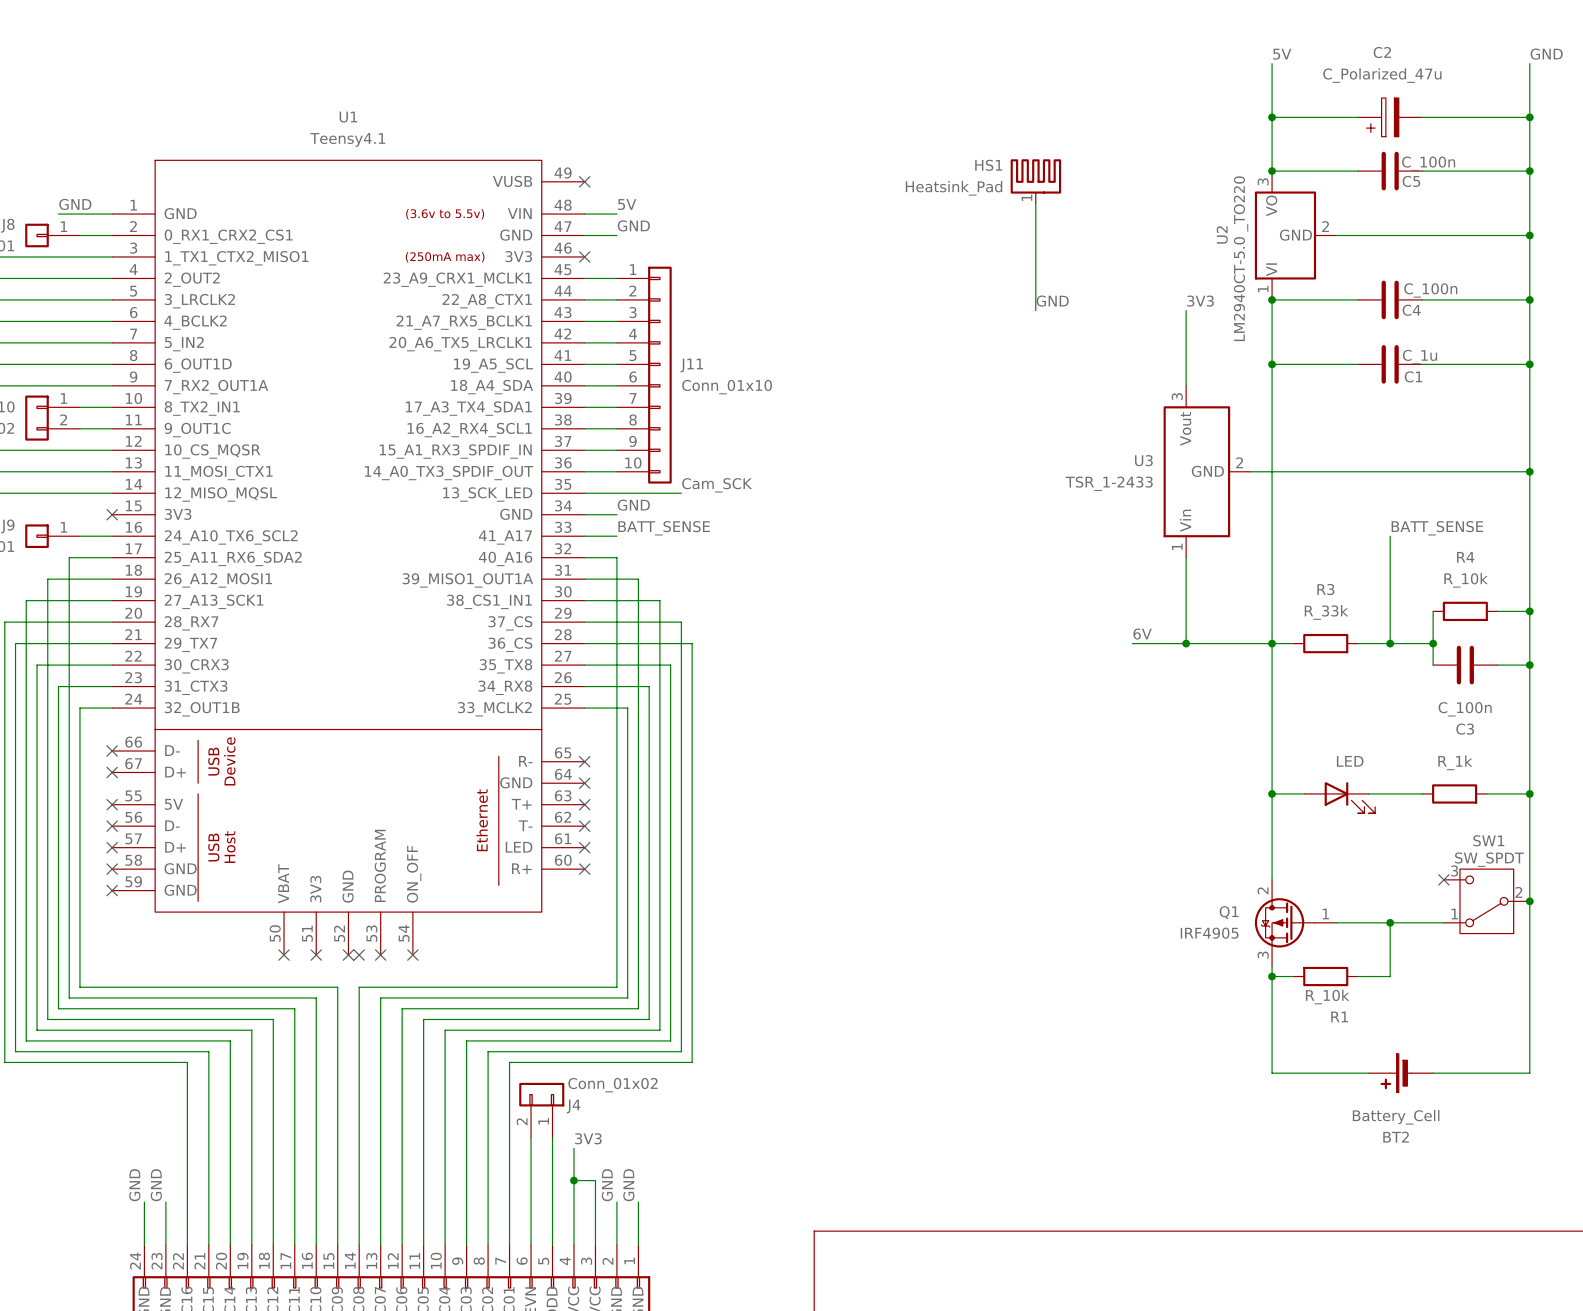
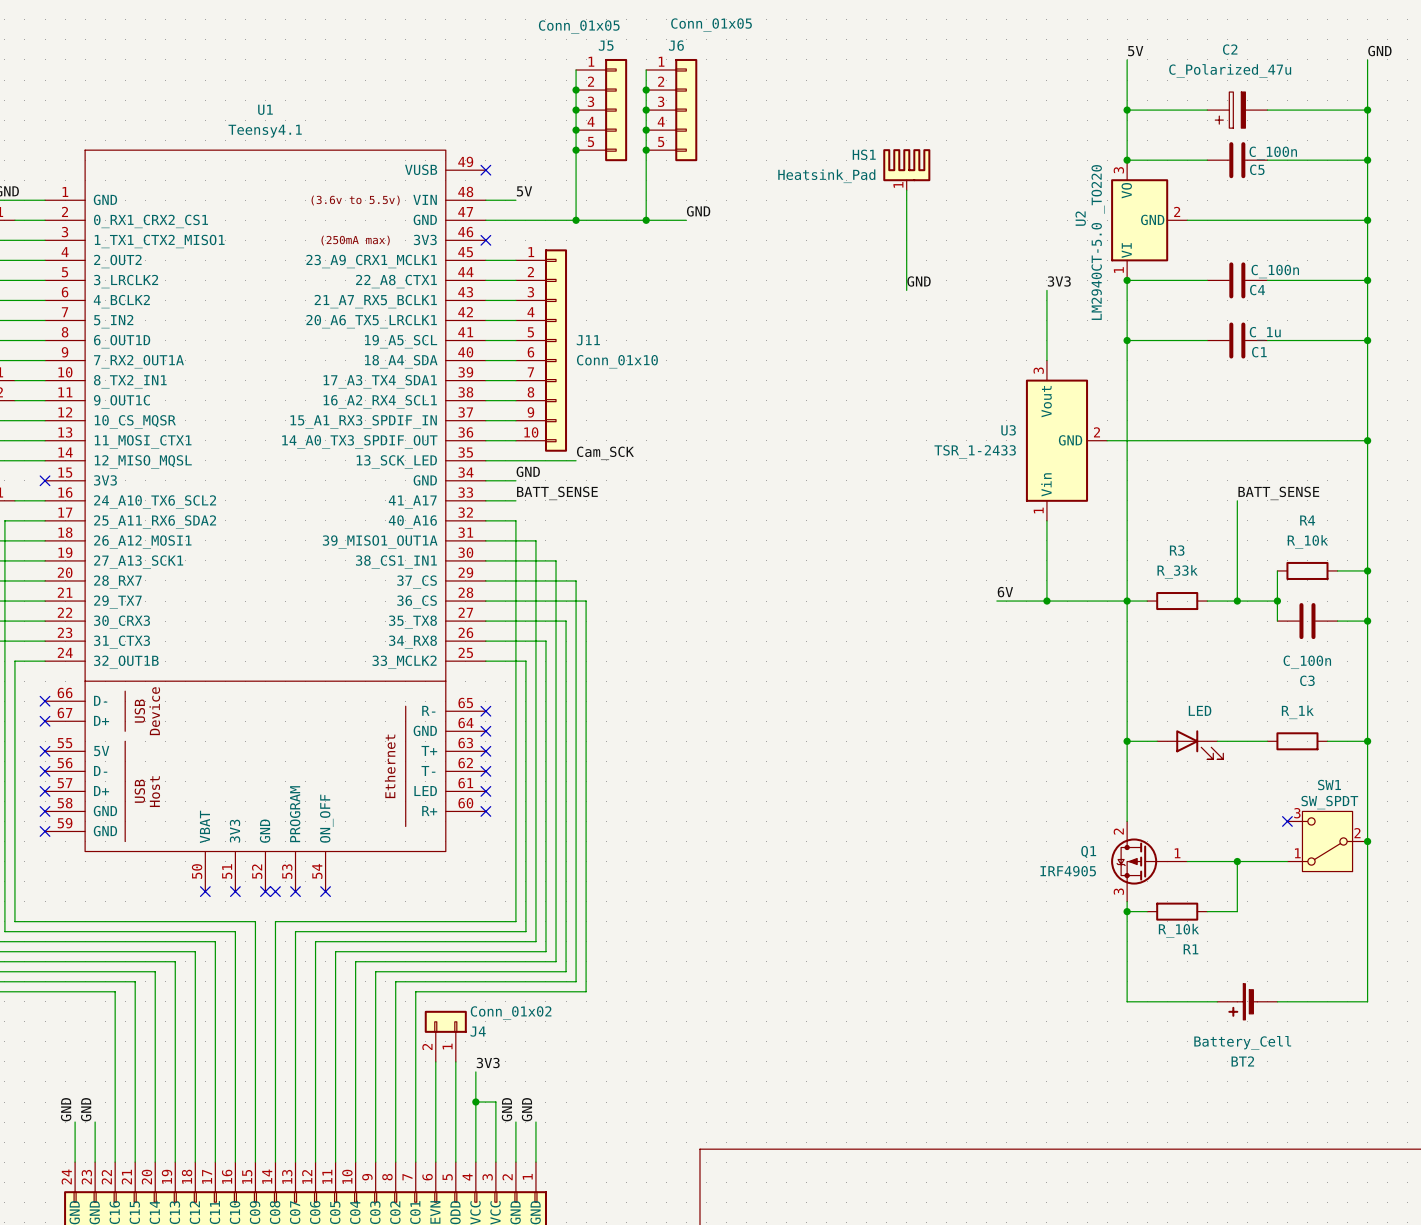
wire: none -> (576, 70) (576, 220)
wire: none -> (646, 70) (646, 220)
junction: none -> (576, 90)
junction: none -> (646, 90)
junction: none -> (576, 110)
J5: none -> Conn_01x05 (601, 110)
junction: none -> (646, 110)
J6: none -> Conn_01x05 (671, 110)
junction: none -> (576, 130)
junction: none -> (646, 130)
junction: none -> (576, 150)
junction: none -> (646, 150)
label position: GND (633, 225) -> GND (698, 211)
wire: none -> (515, 220) (686, 220)
junction: none -> (576, 220)
junction: none -> (646, 220)

